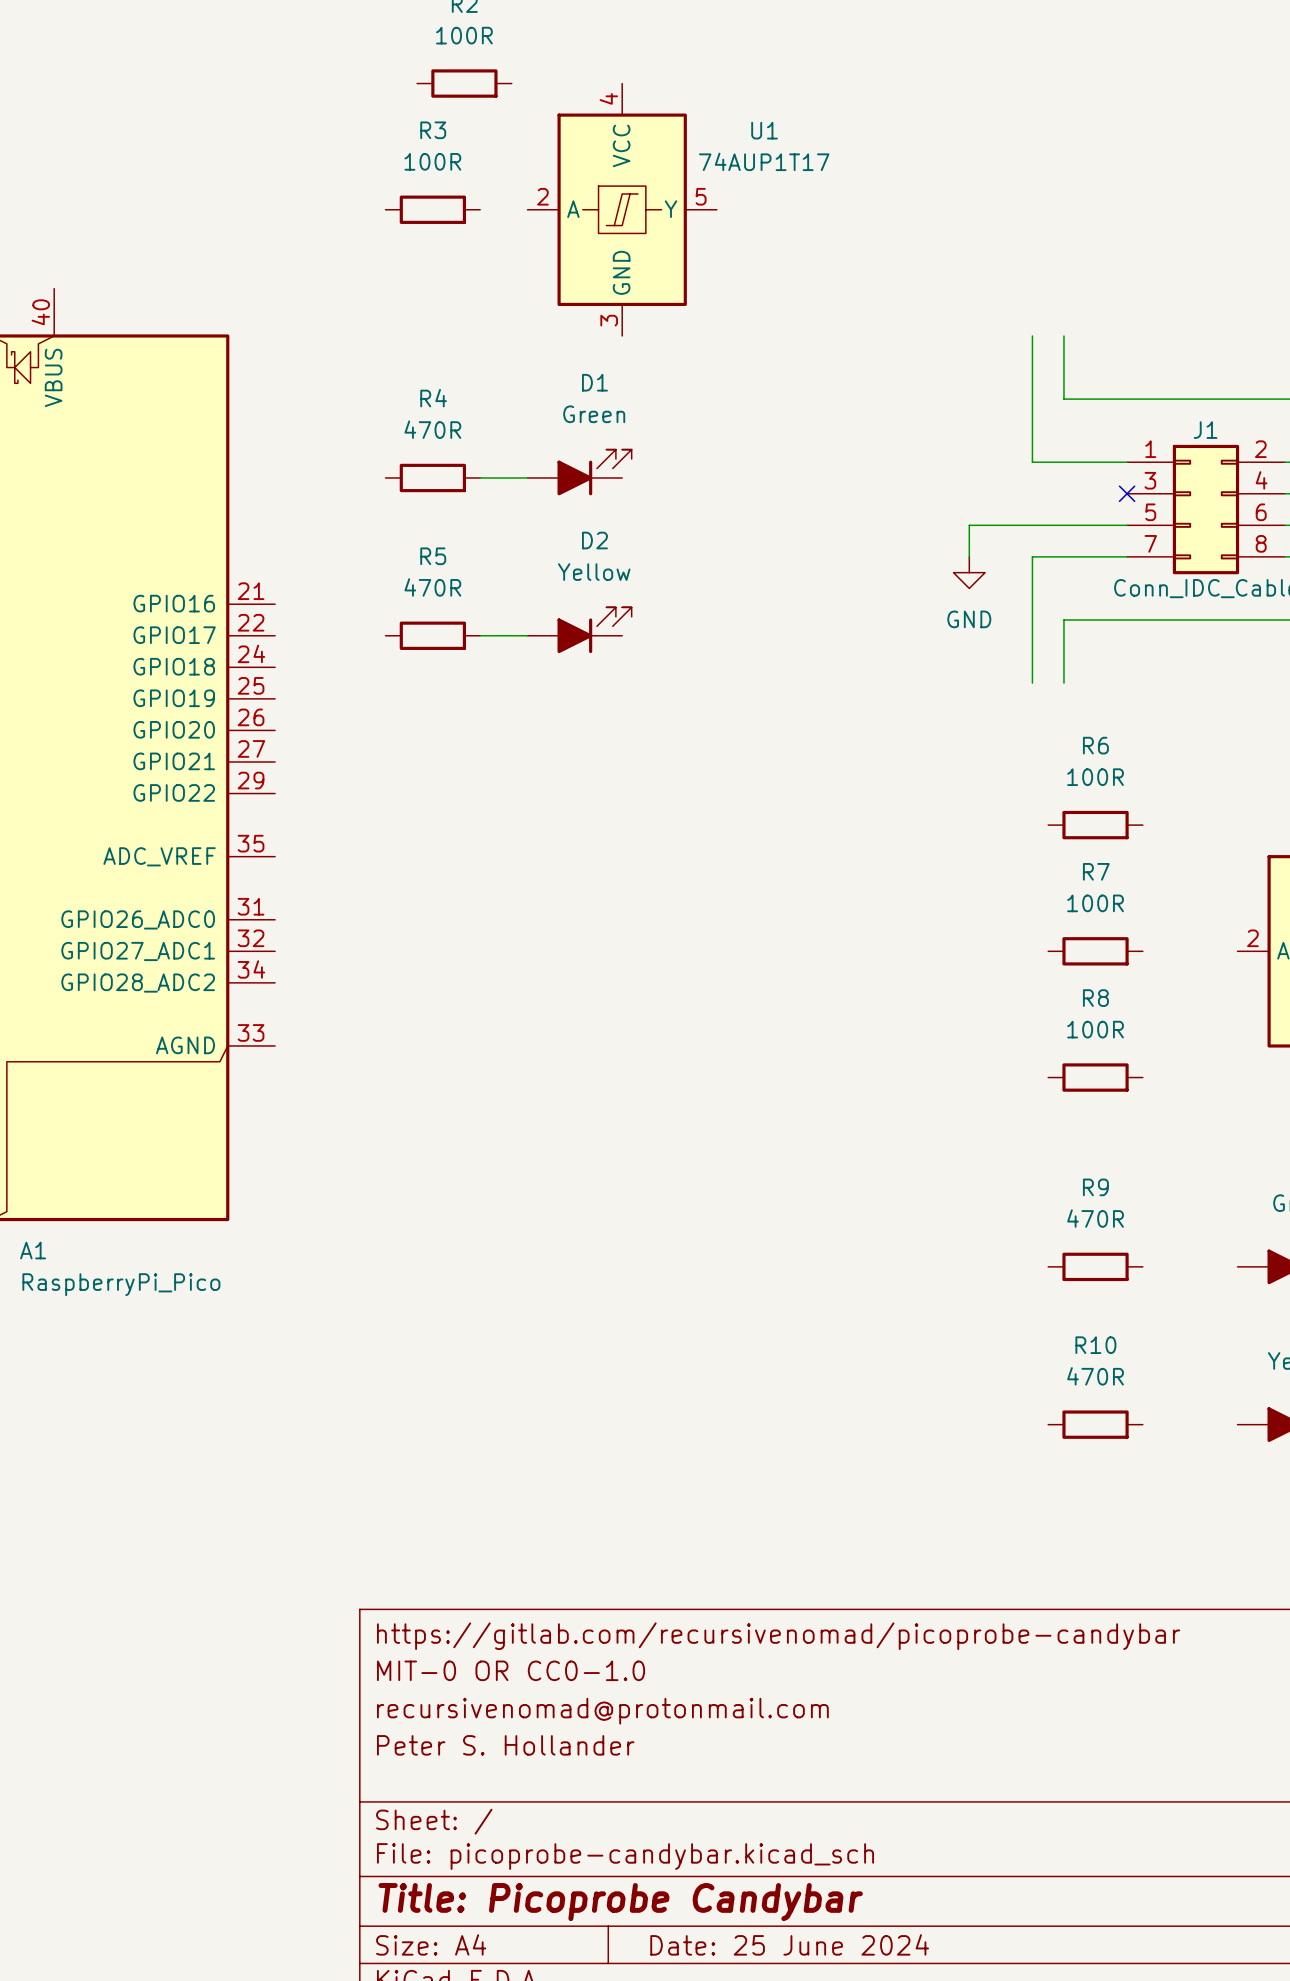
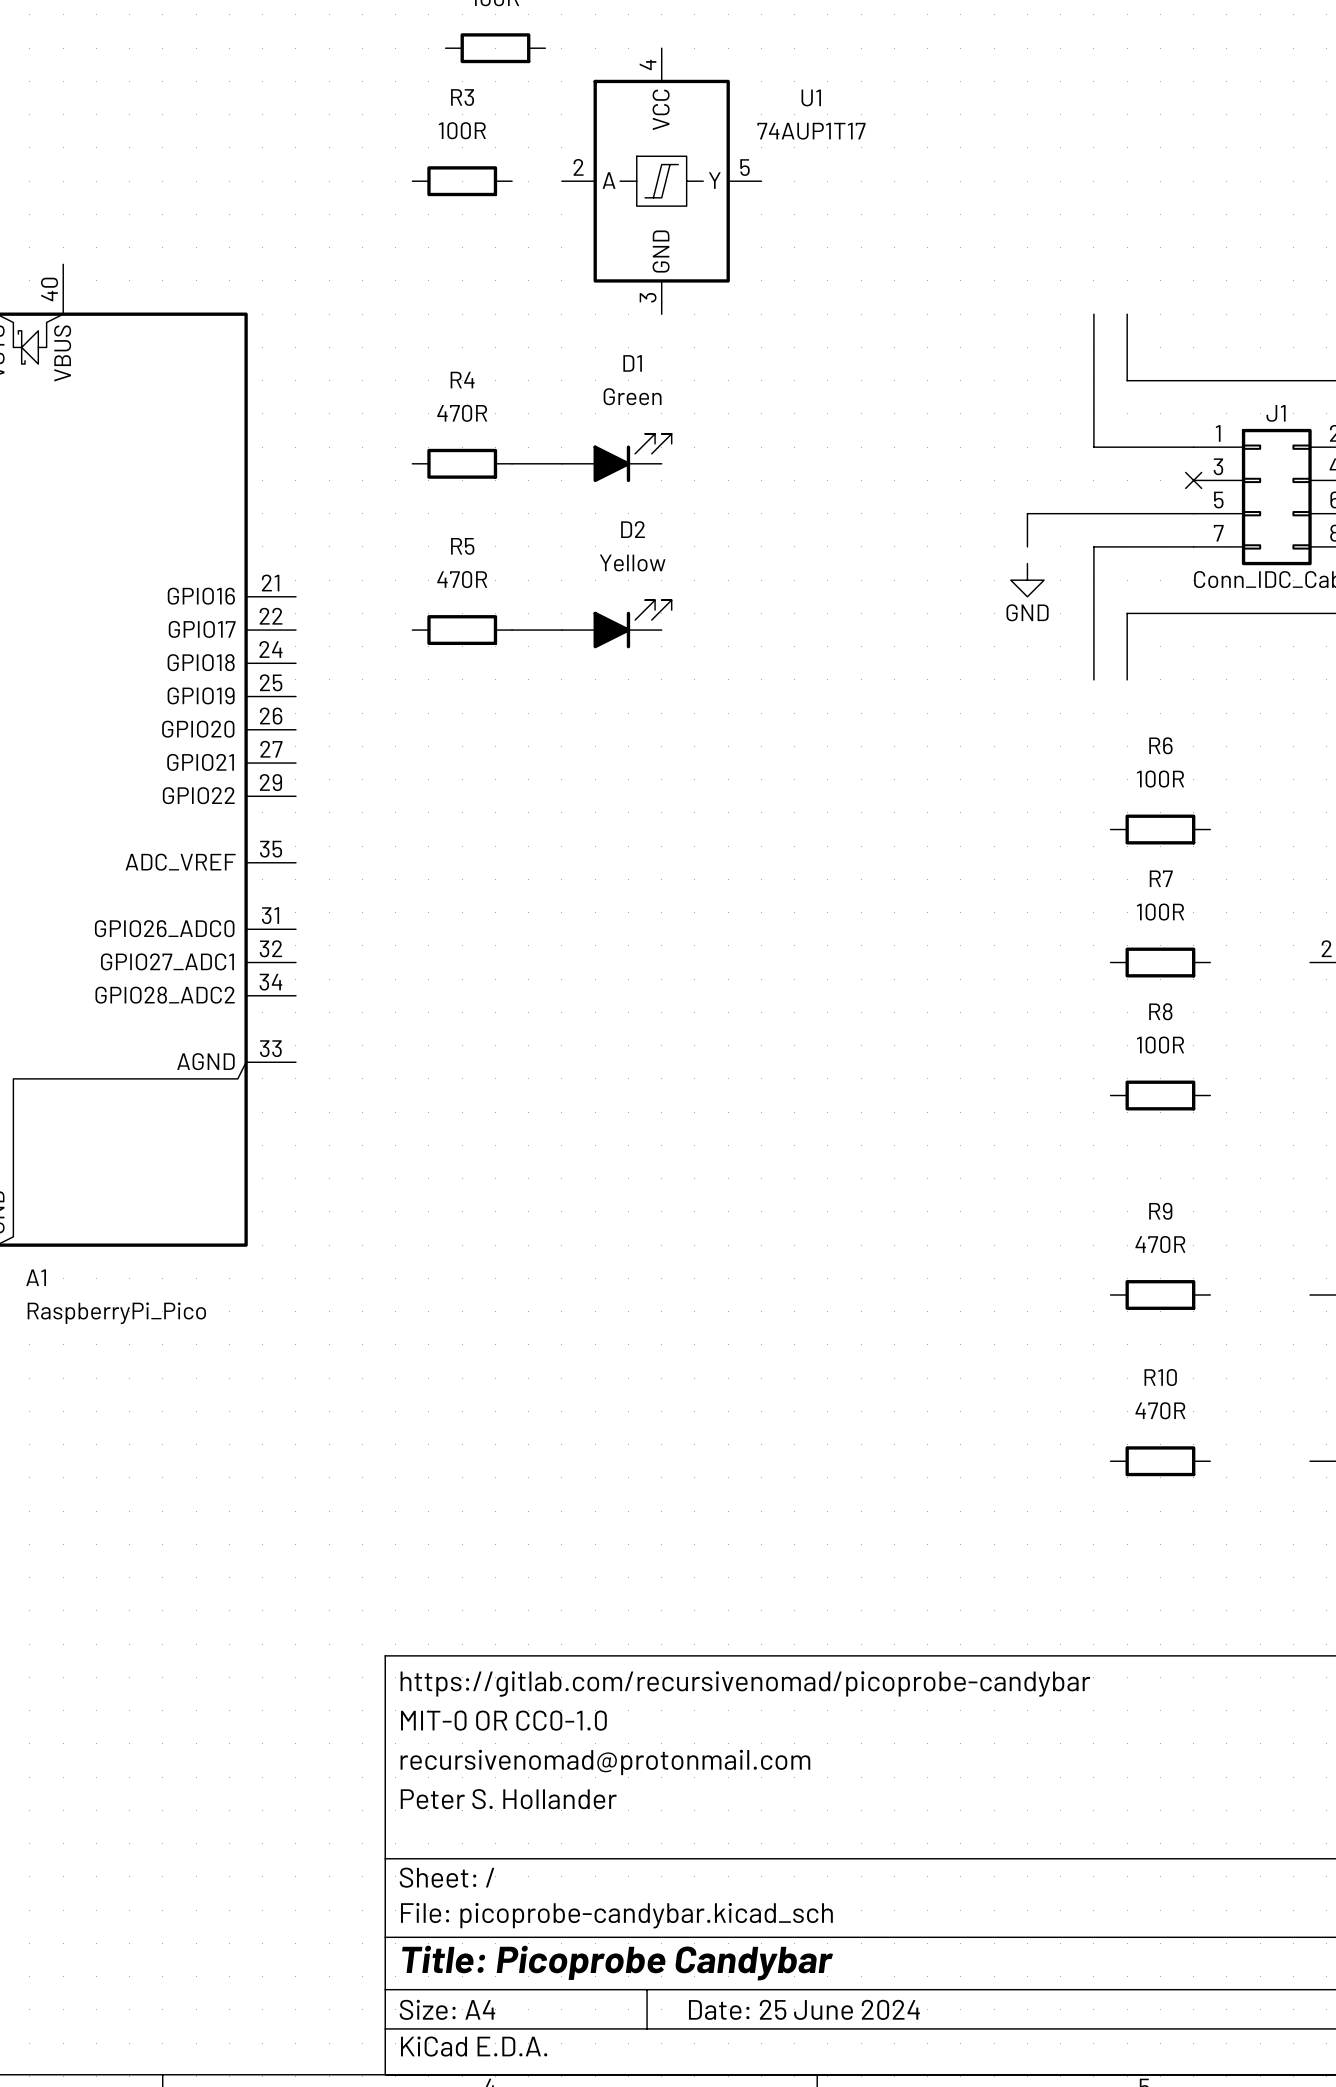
power symbol position: GND (969, 572) -> GND (1027, 580)

